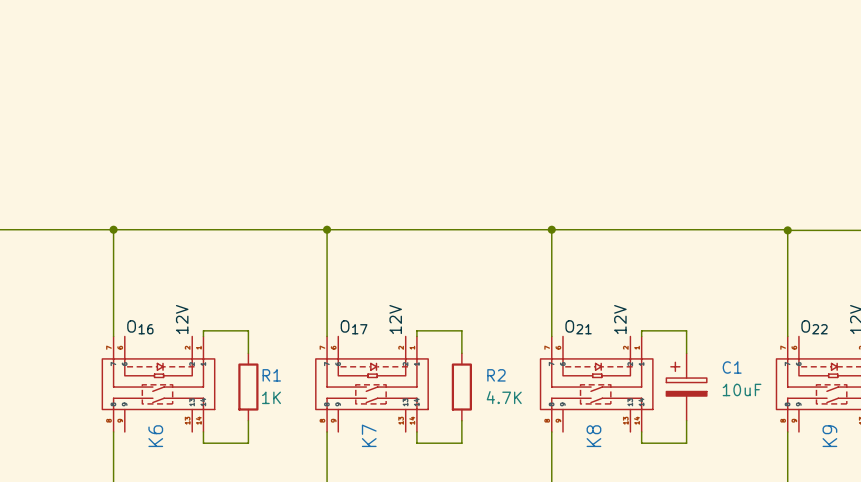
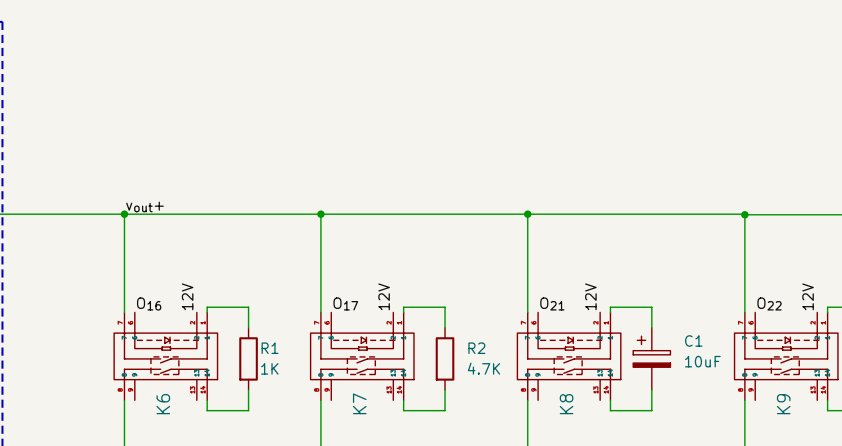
label: none -> vout+ (144, 206)

